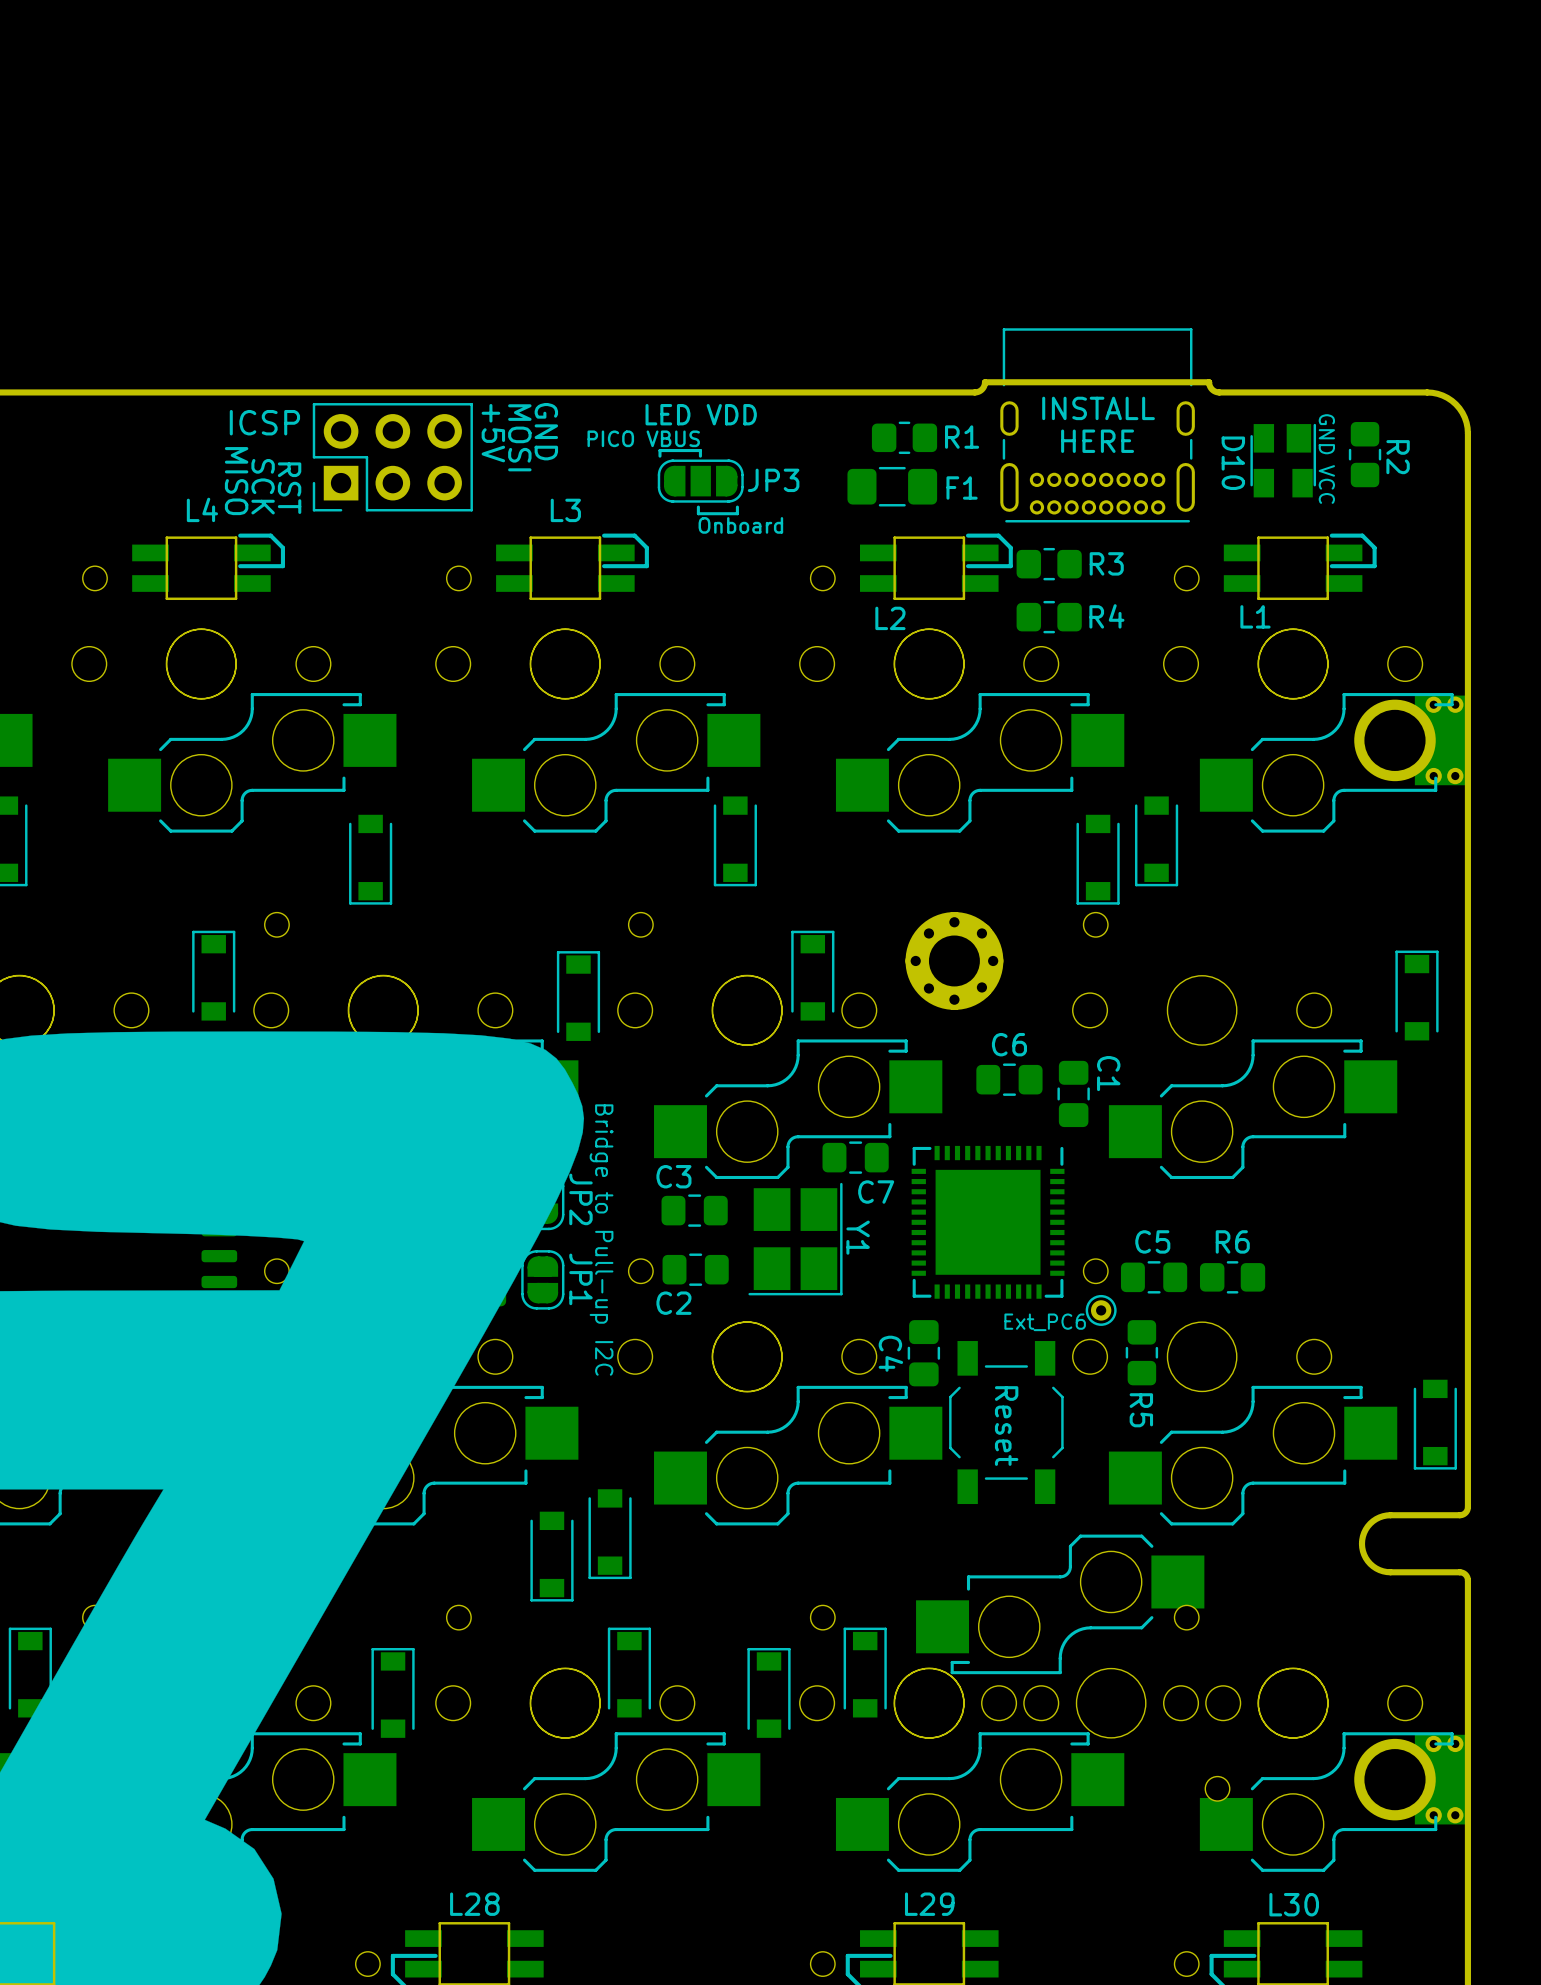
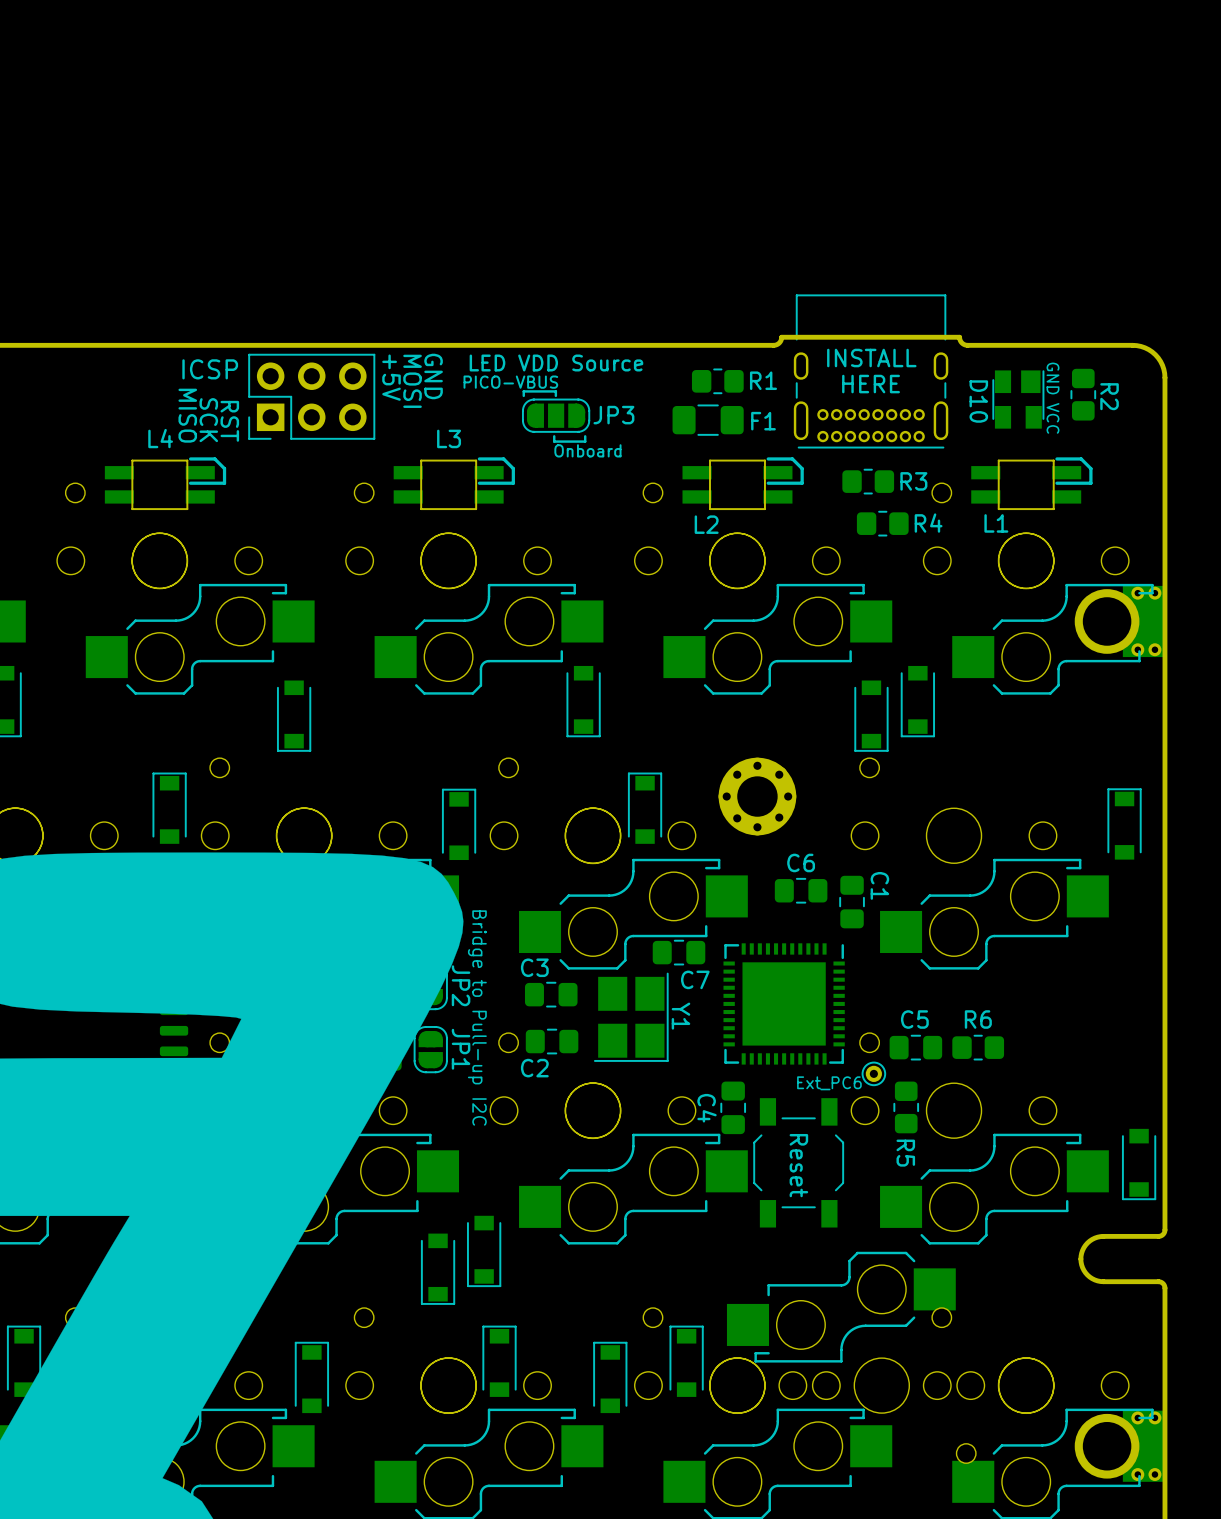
JP3 text: LED VDD (701, 414) -> LED VDD Source (556, 363)
JP3 text: PICO VBUS (643, 438) -> PICO-VBUS (510, 382)
R3 position: (1049, 564) -> (868, 481)
R4 position: (1049, 617) -> (882, 523)

